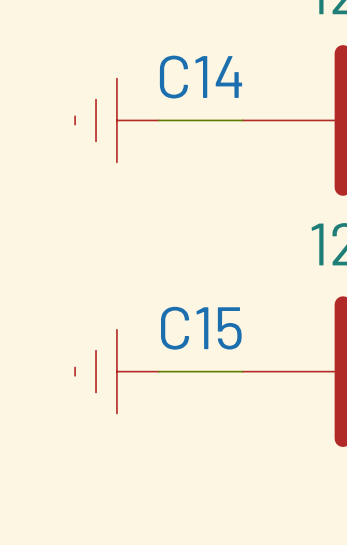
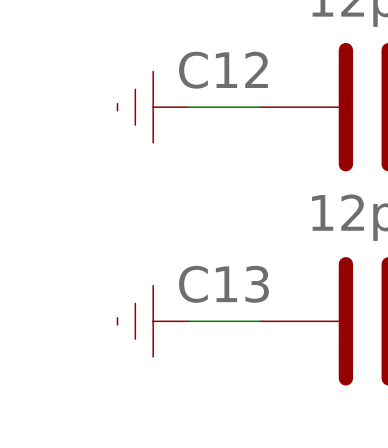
C14 name: C14 (201, 77) -> C12 (223, 70)
C15 name: C15 (201, 328) -> C13 (223, 284)

